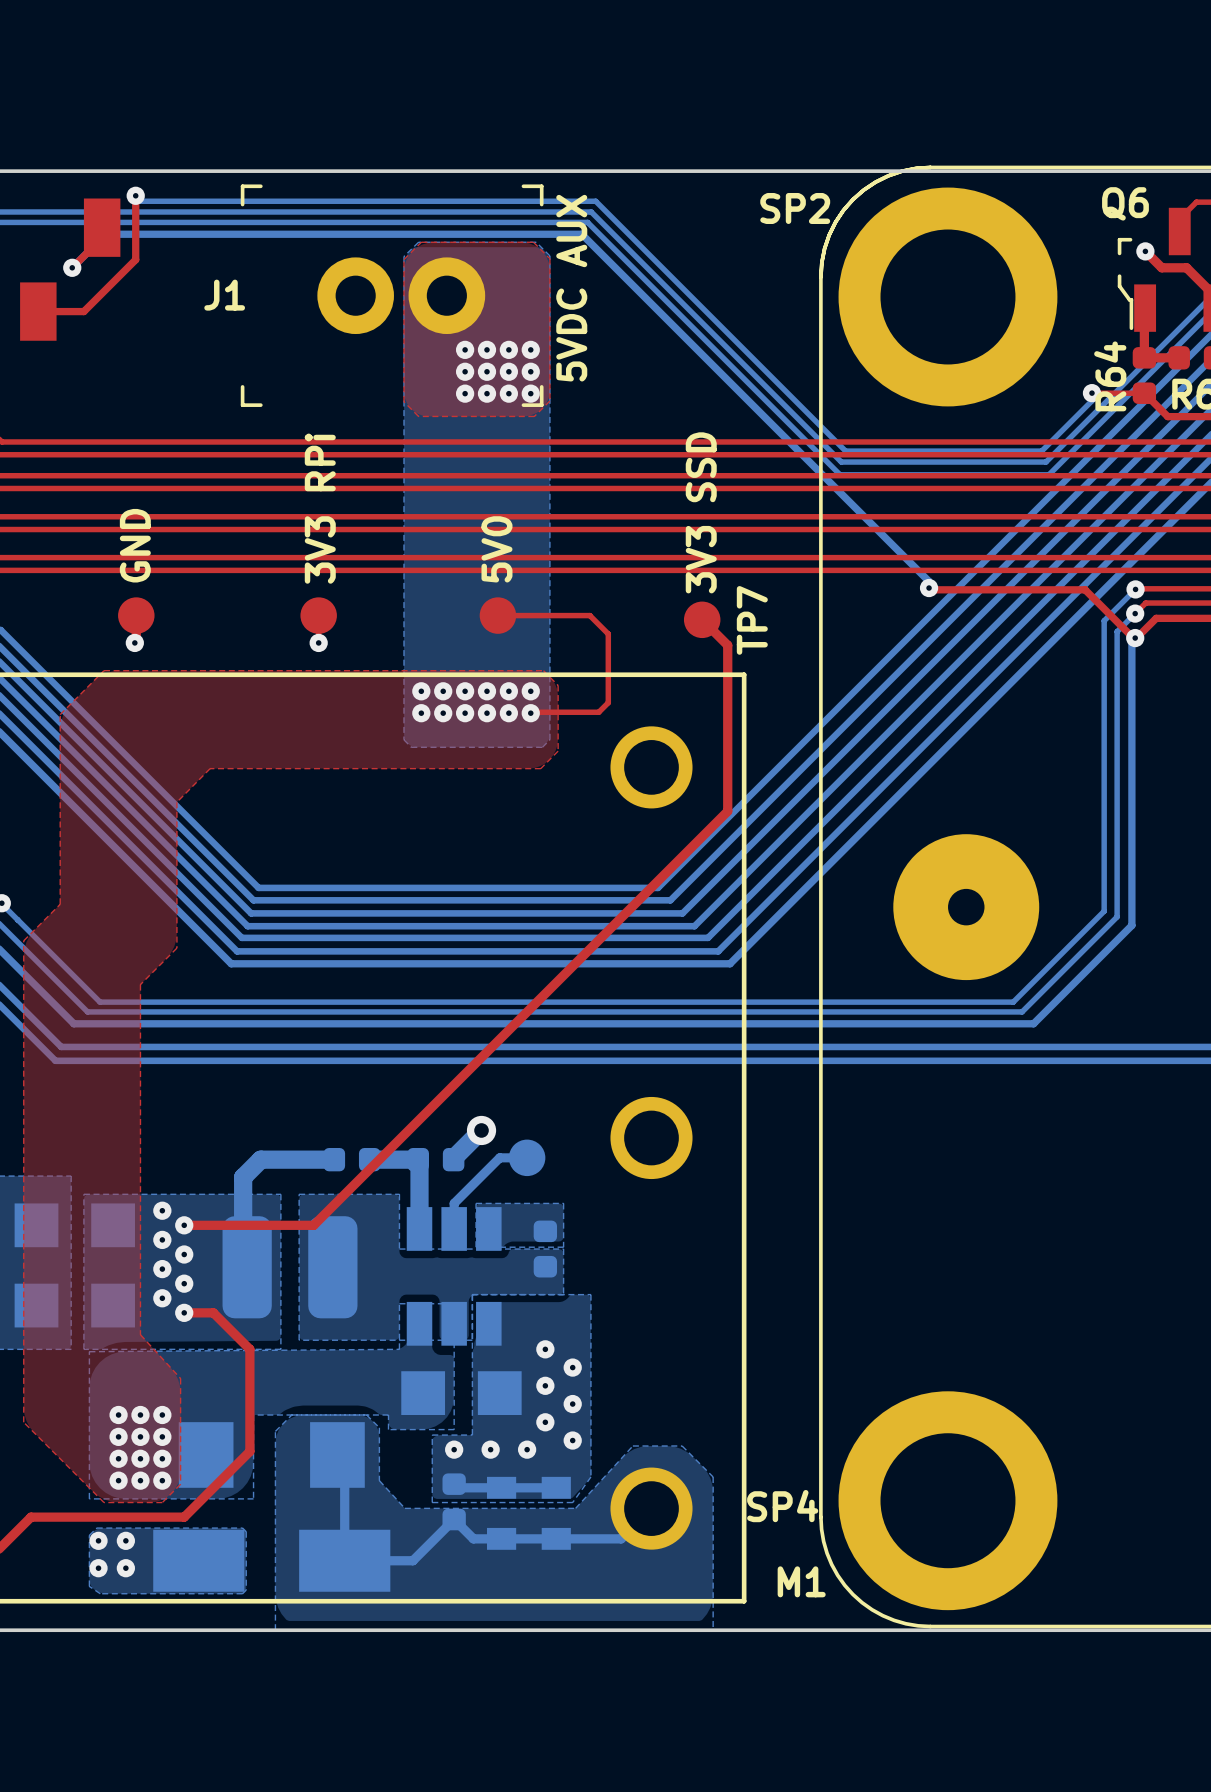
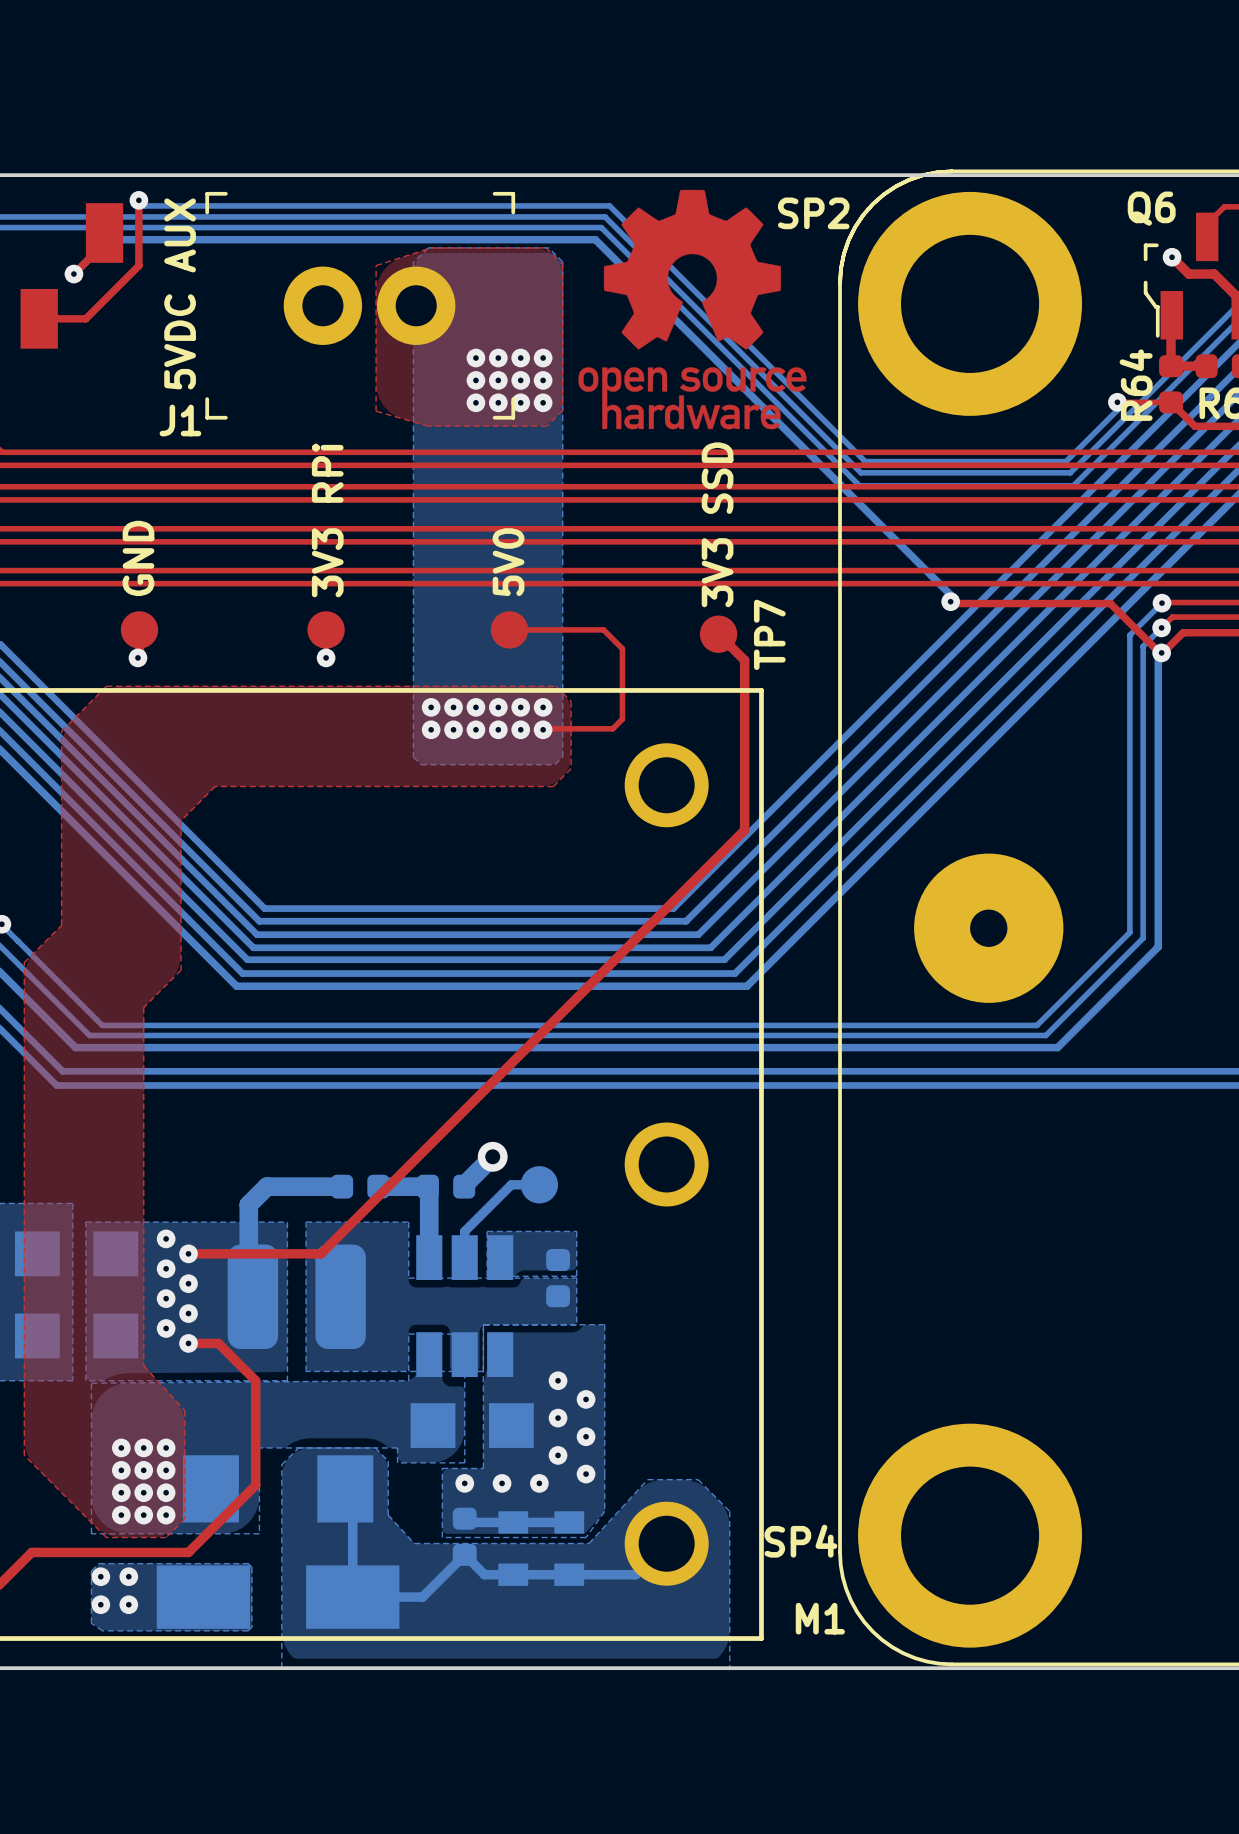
drawing: none -> [578, 189, 807, 430]
top zone outline: (421, 242) (404, 259) (404, 401) (418, 416) -> (431, 247) (376, 265) (376, 411) (428, 426)
text position: 5VDC AUX (571, 288) -> 5VDC AUX (180, 293)
J1 name position: J1 (224, 295) -> J1 (180, 420)
J1 position: (392, 295) -> (360, 305)

